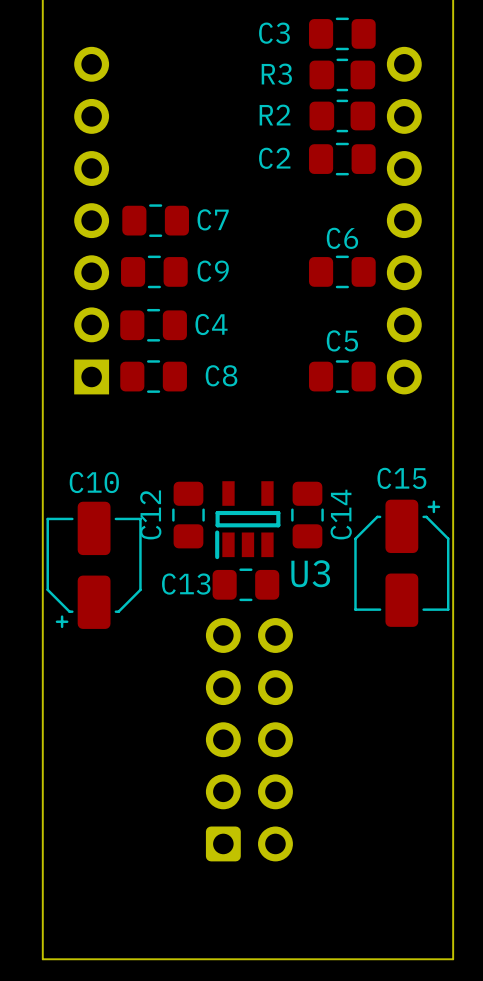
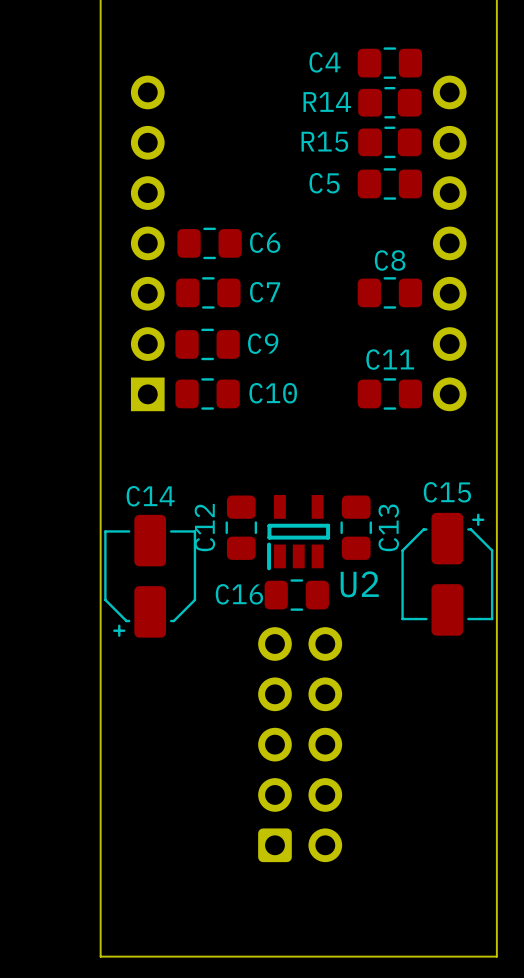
C3 name: C3 (274, 33) -> C4 (324, 62)
R3 name: R3 (276, 74) -> R14 (327, 101)
R2 name: R2 (275, 115) -> R15 (324, 141)
C2 name: C2 (274, 158) -> C5 (324, 183)
C7 name: C7 (213, 219) -> C6 (265, 242)
C6 name: C6 (342, 238) -> C8 (390, 260)
C9 name: C9 (213, 271) -> C7 (265, 292)
C4 name: C4 (211, 324) -> C9 (263, 343)
C5 name: C5 (342, 340) -> C11 (390, 359)
C8 name: C8 (221, 375) -> C10 (273, 393)
C10 name: C10 (94, 482) -> C14 (150, 496)
C14 name: C14 (341, 514) -> C13 (388, 527)
U3 name: U3 (310, 573) -> U2 (359, 584)
C13 name: C13 (186, 584) -> C16 (239, 594)

